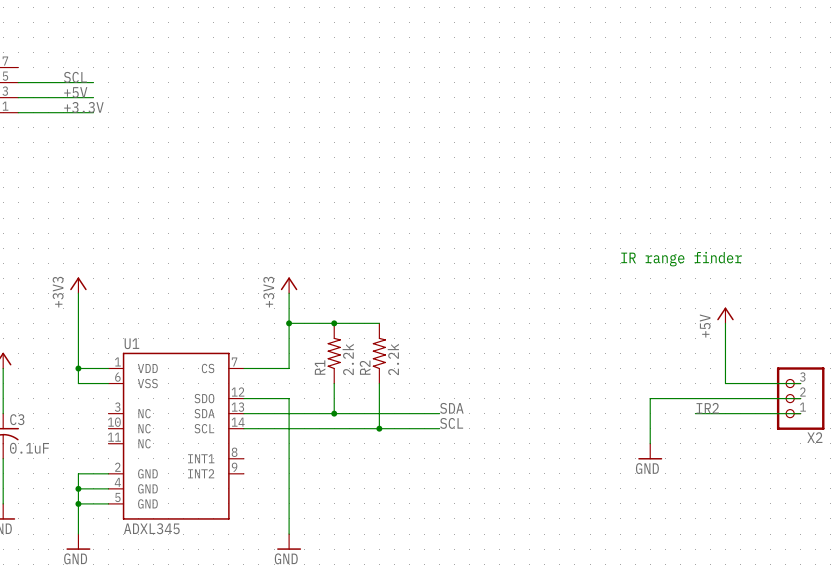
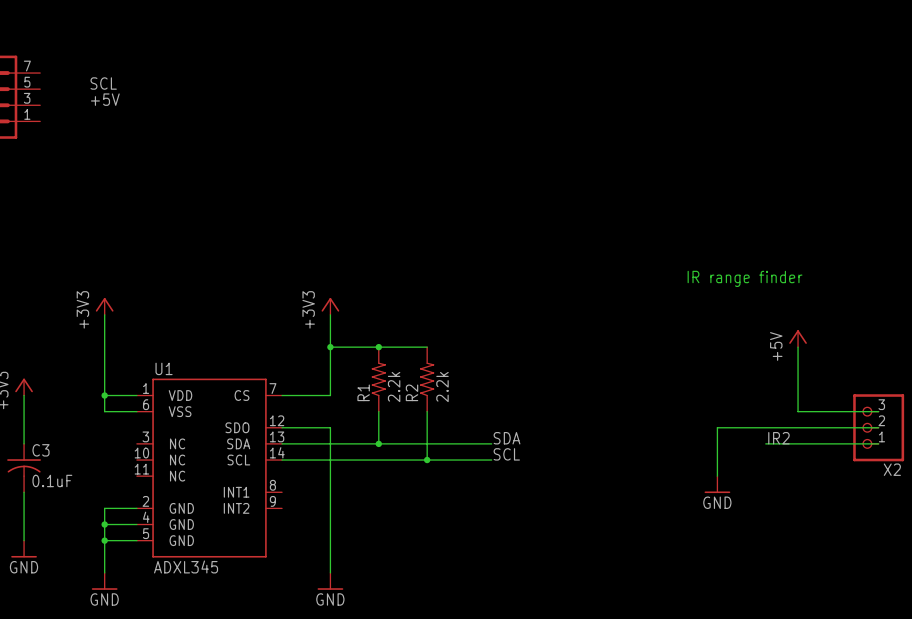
wire: (18, 82) (93, 82) -> none
wire: (18, 97) (93, 97) -> none
label: +3.3V (83, 107) -> none
wire: (18, 112) (93, 112) -> none

